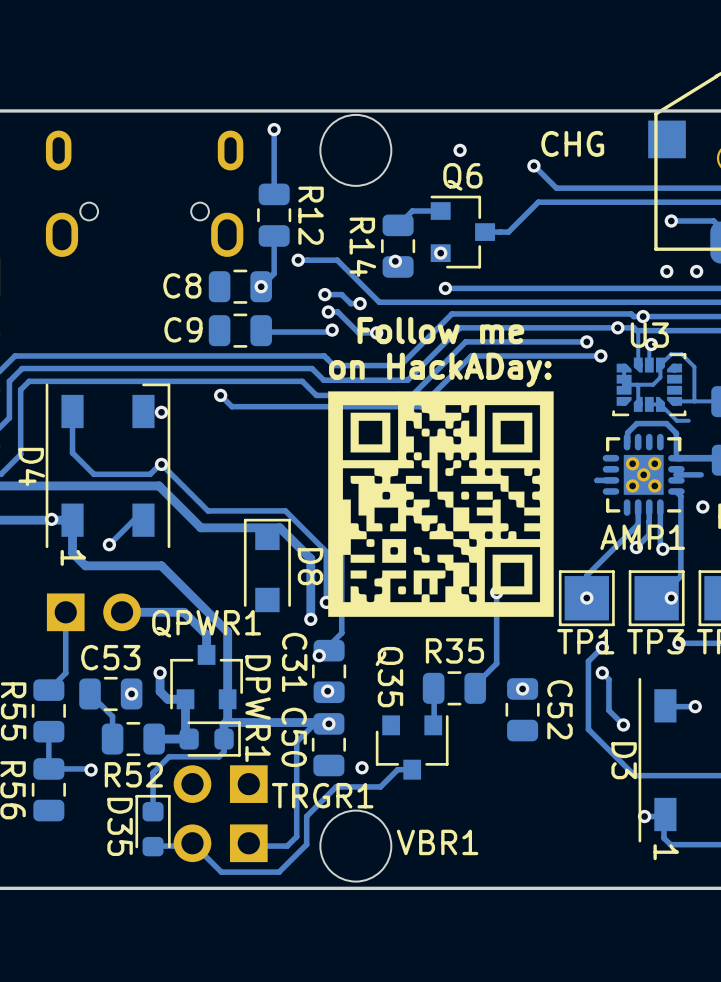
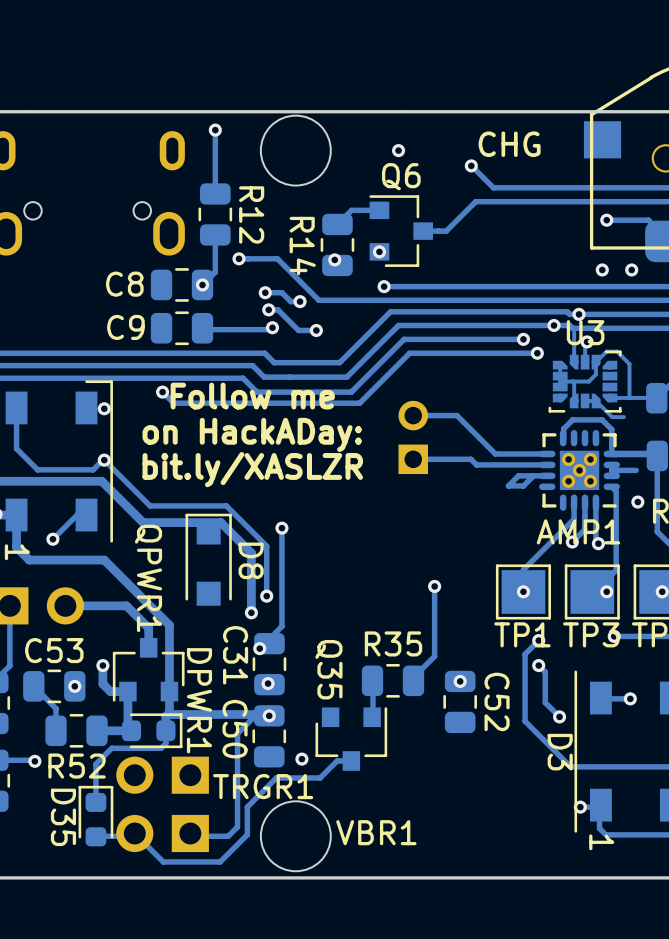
text position: Follow me (440, 330) -> Follow me (252, 396)
text position: on HackADay: (440, 369) -> on HackADay: (252, 434)
drawing: [328, 391, 554, 617] -> none
track: none -> (413, 415) (456, 415) (495, 454) (547, 454)
part: none -> (413, 437)
track: none -> (413, 459) (470, 459) (476, 464) (547, 464)
text: none -> bit.ly/XASLZR (252, 469)
track: none -> (533, 475) (523, 485) (508, 485) (518, 475) (533, 475)
QPWR1 name rotation: 0° (206, 623) -> 90° clockwise (148, 578)

